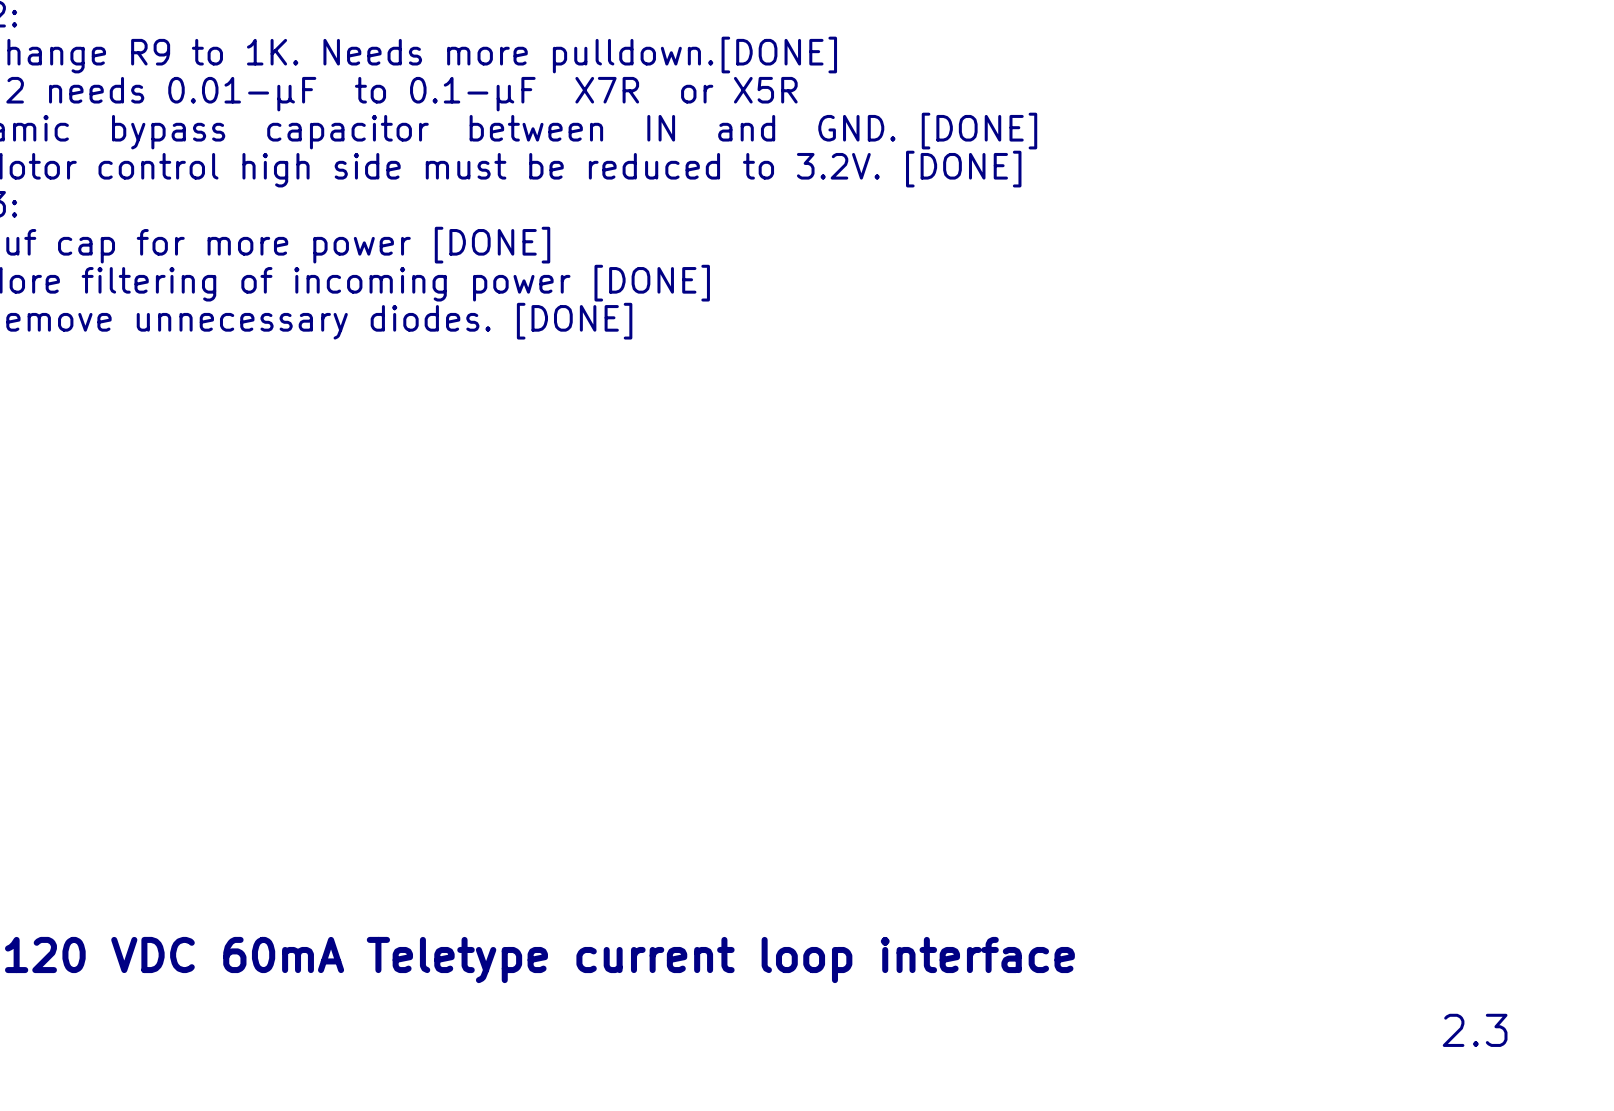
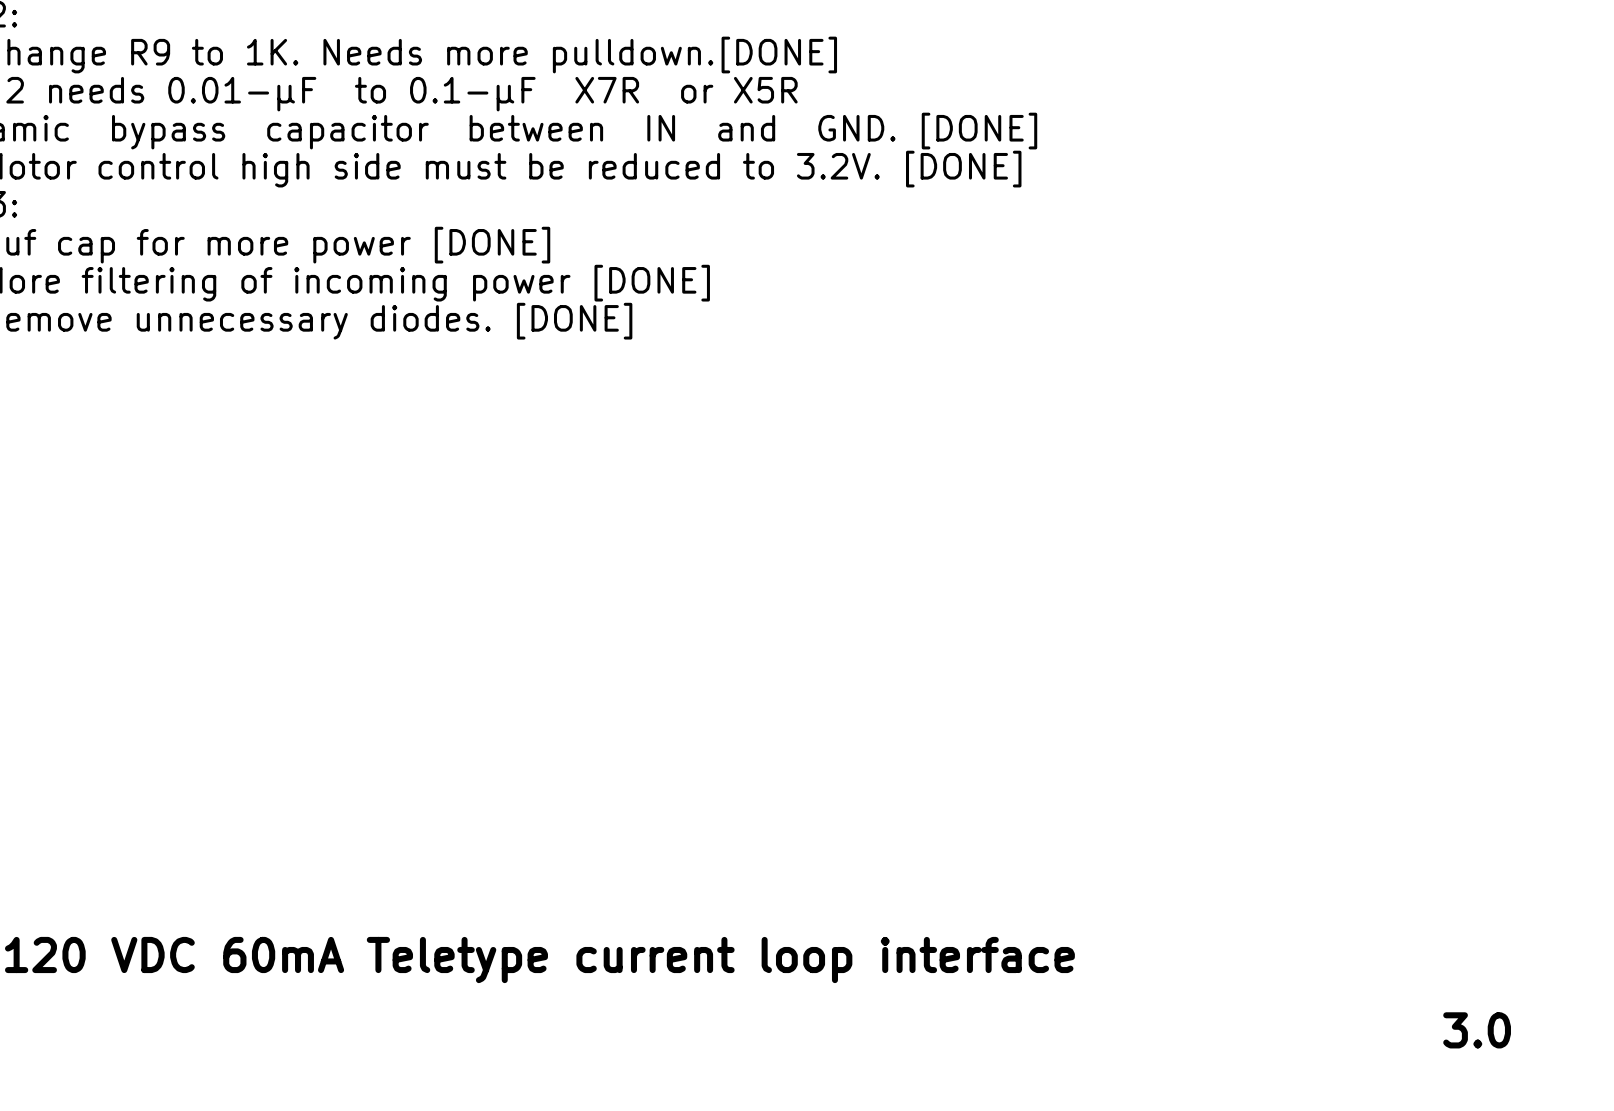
text: 2.3 (1475, 1030) -> 3.0 (1477, 1030)

